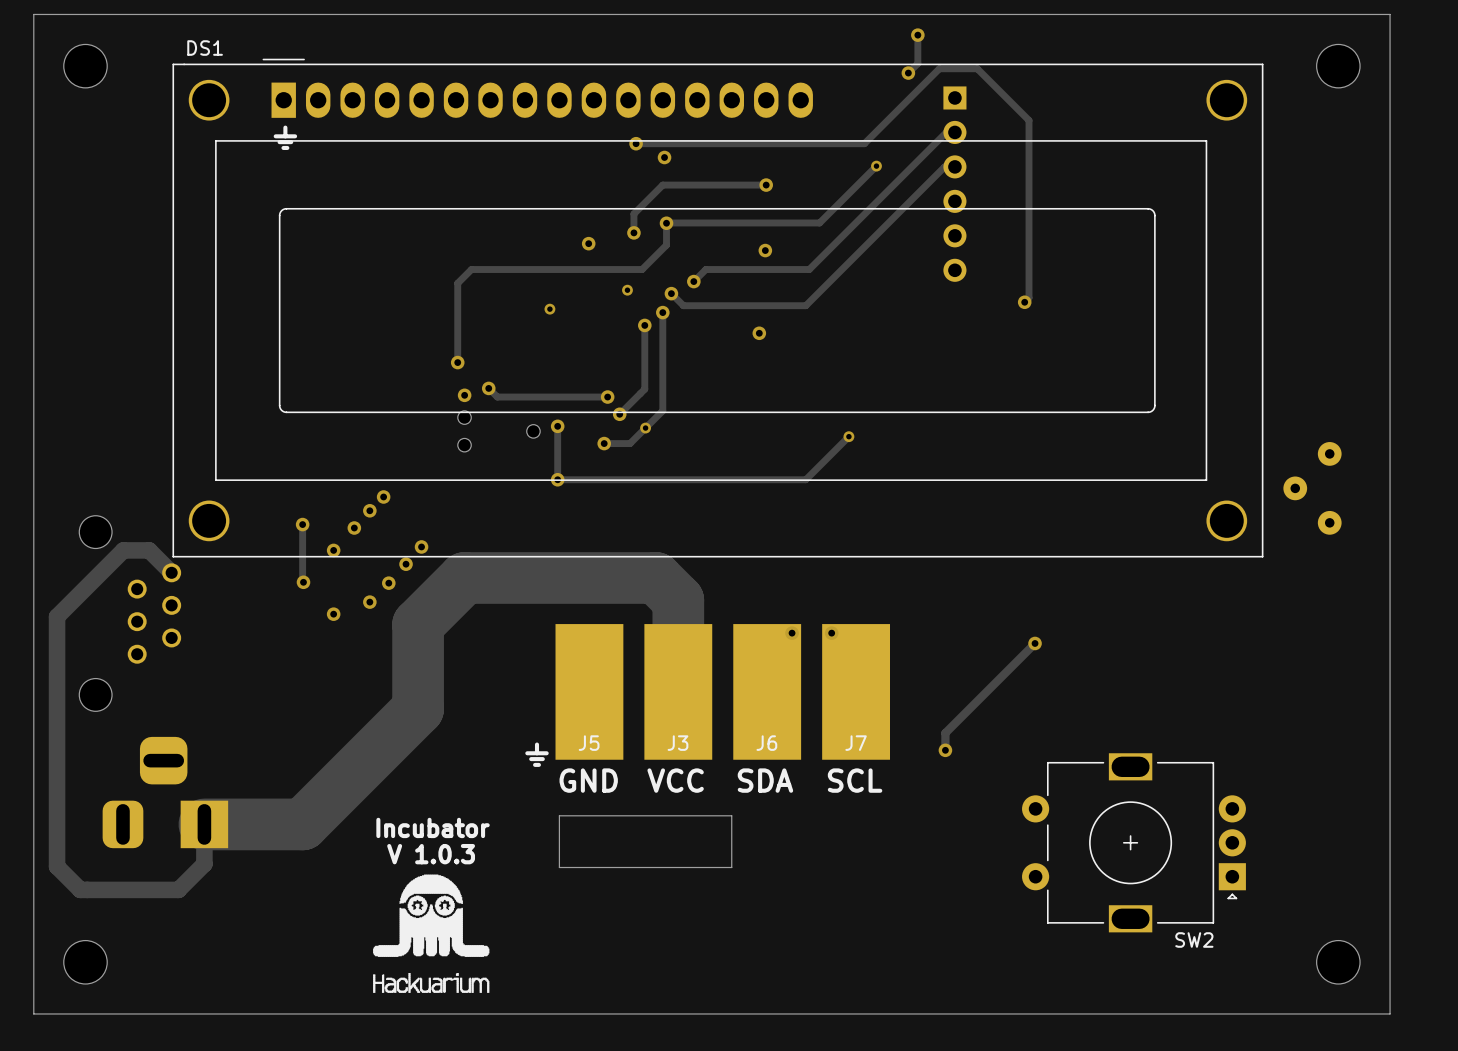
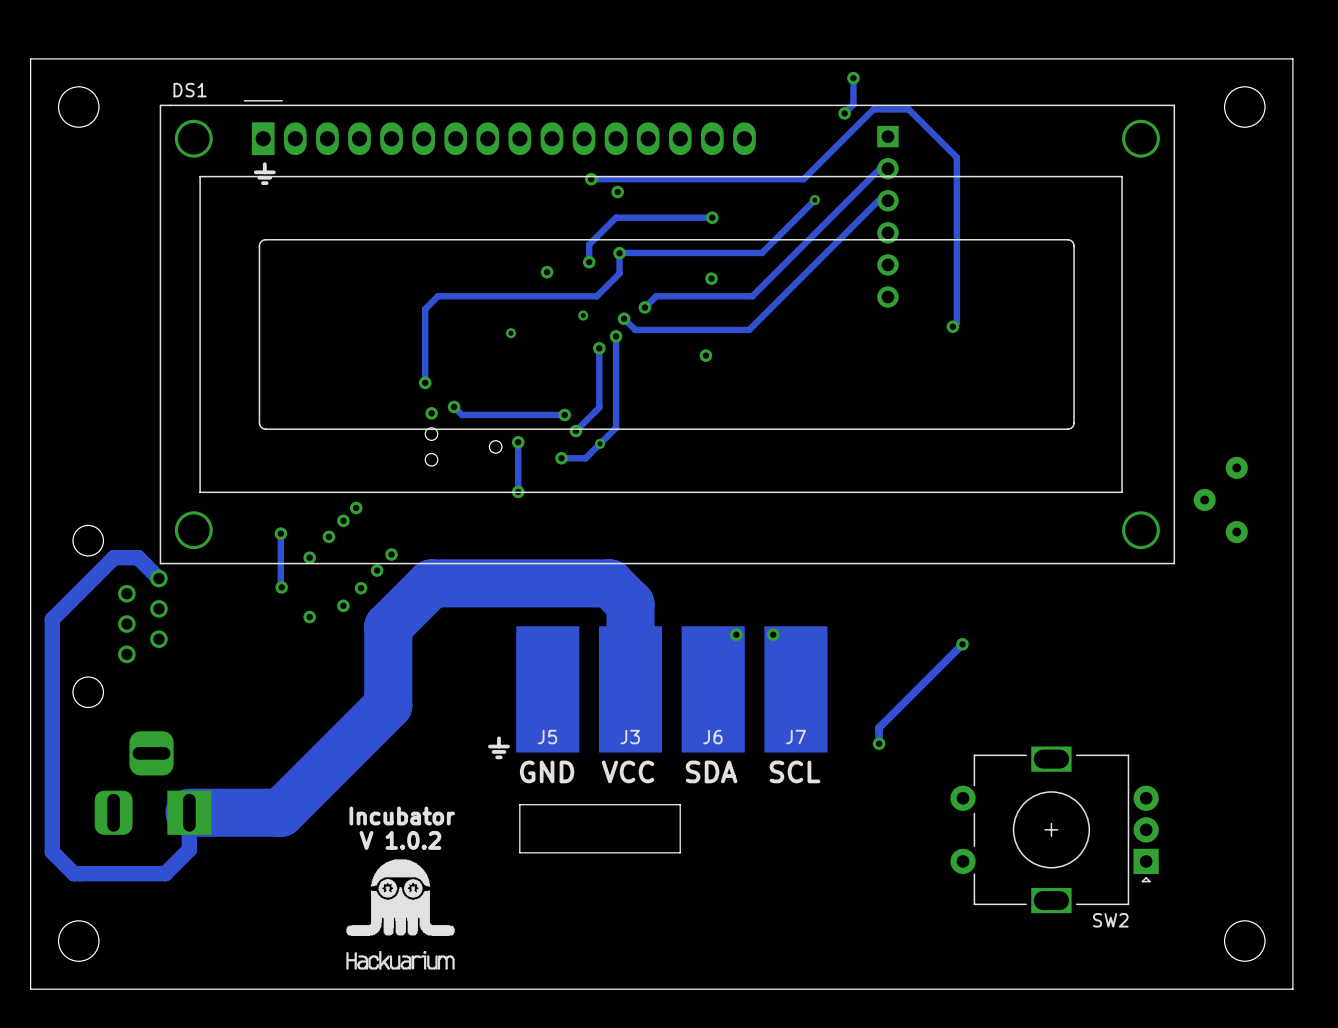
track: (848, 436) (805, 479) (557, 479) -> none
via: (848, 436) -> none
text: V 1.0.3 (431, 854) -> V 1.0.2 (400, 840)

